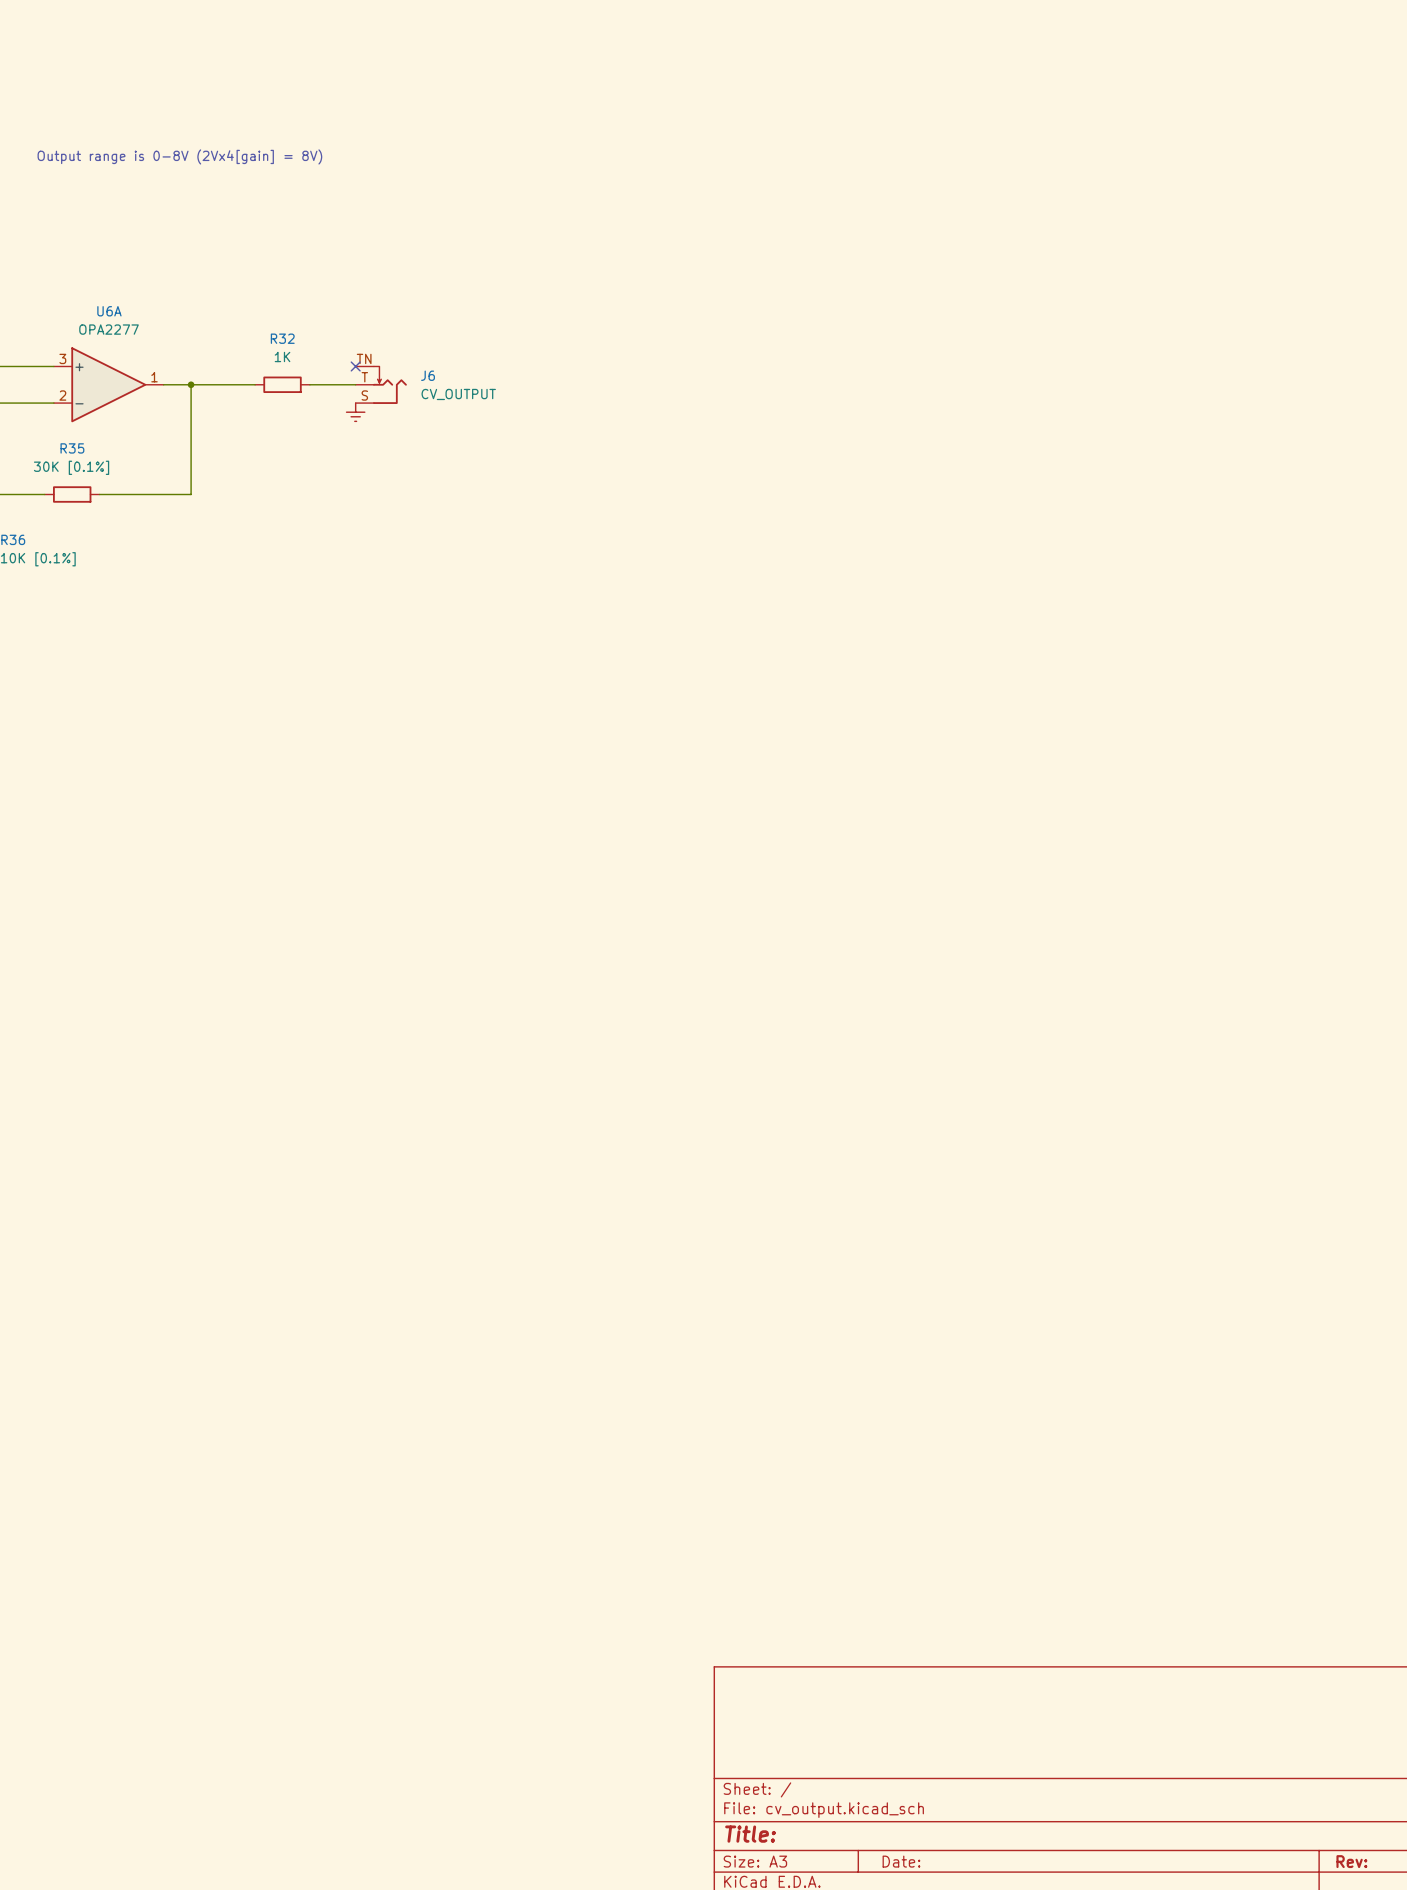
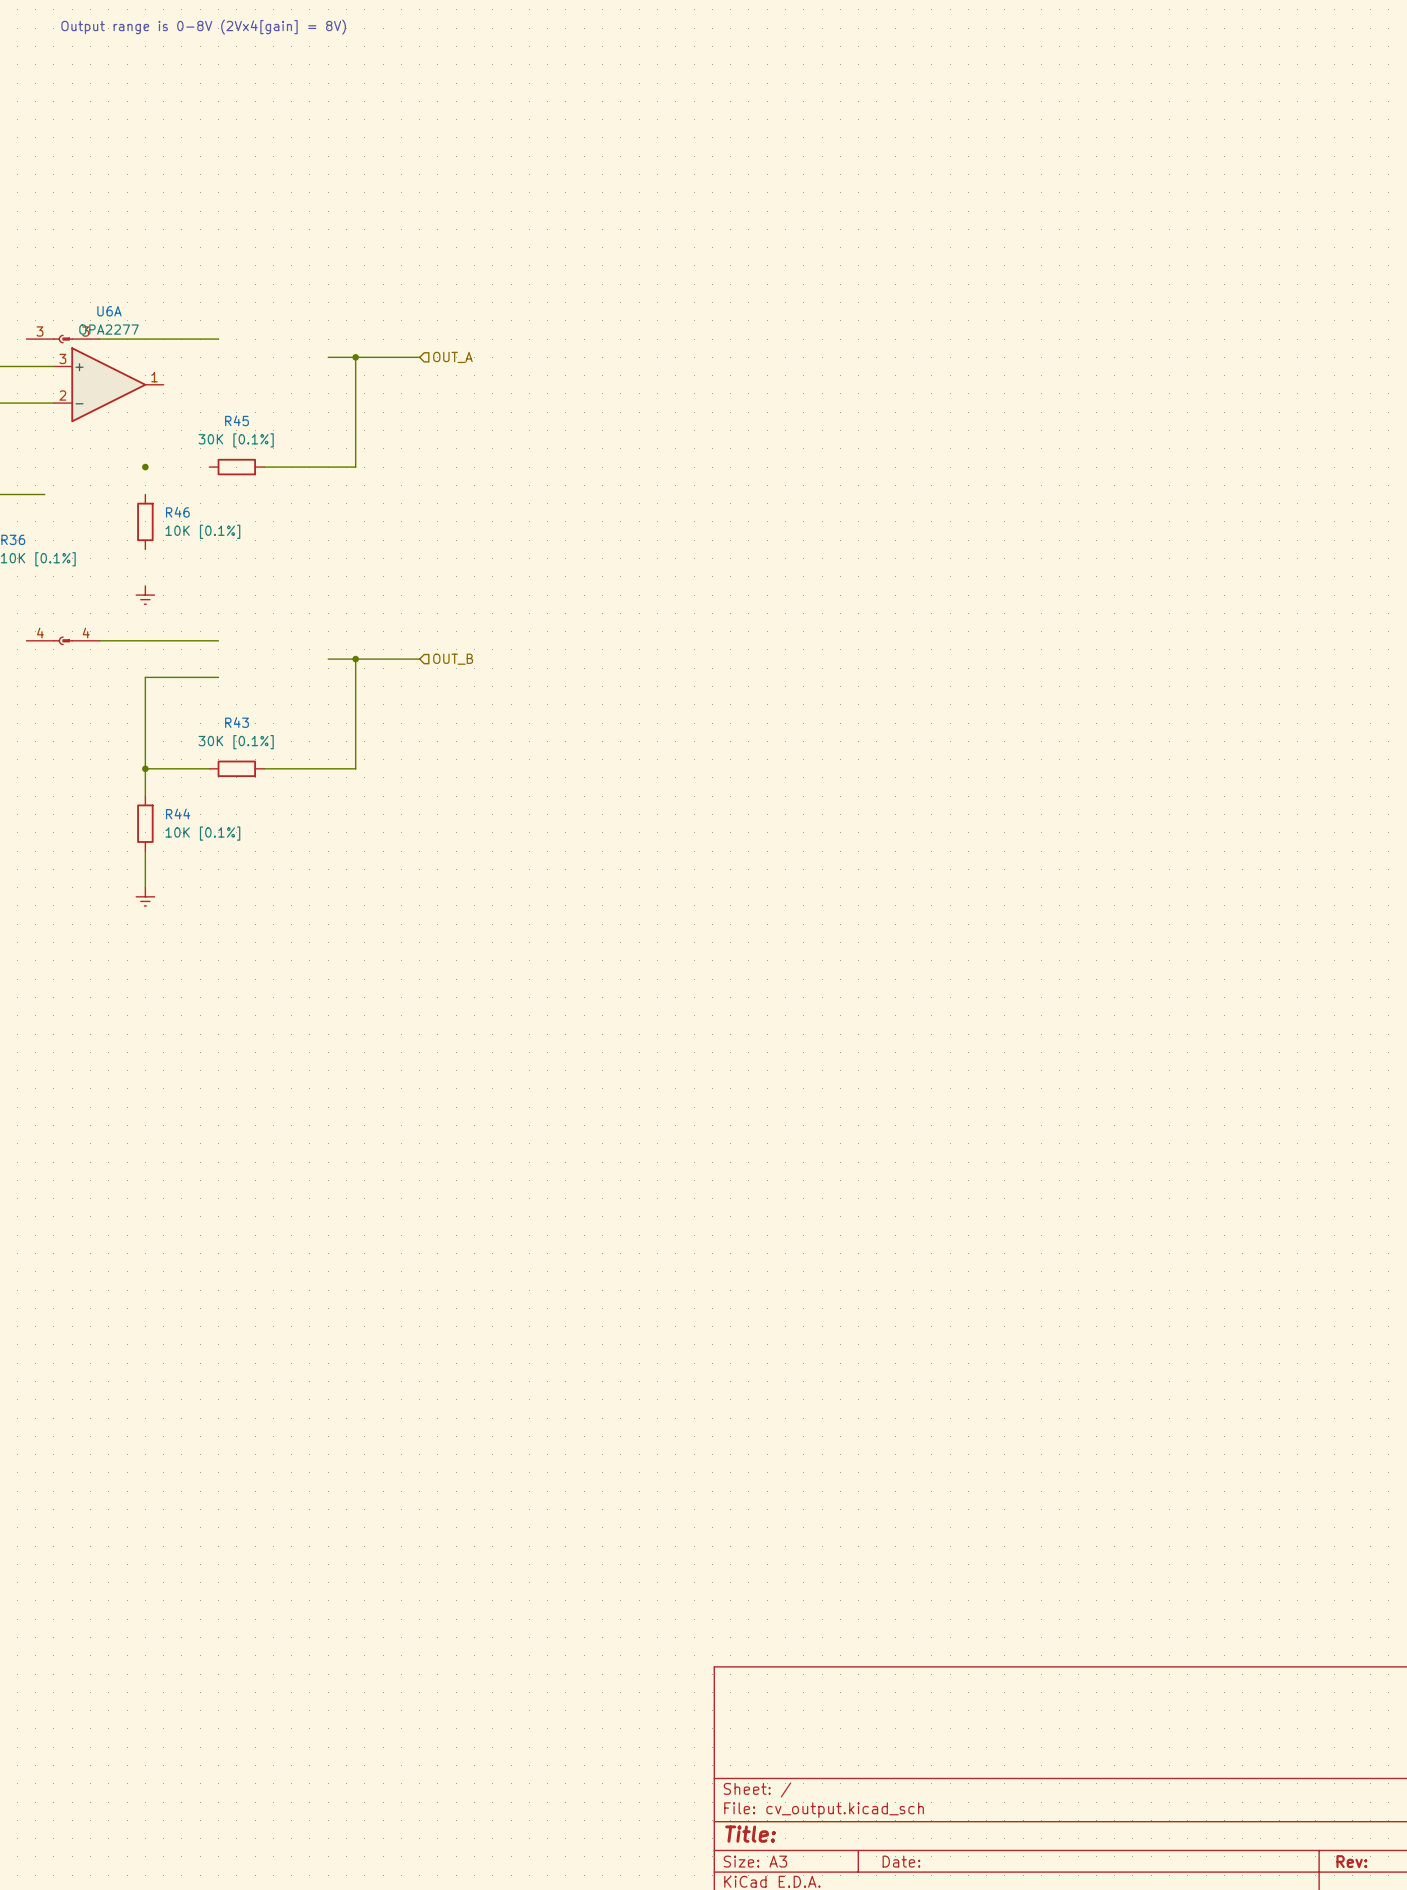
text position: Output range is 0-8V (2Vx4[gain] = 8V) (179, 156) -> Output range is 0-8V (2Vx4[gain] = 8V) (203, 27)
part: none -> (45, 339)
part: none -> (81, 339)
wire: none -> (99, 339) (218, 339)
junction: none -> (355, 357)
hierarchical label: none -> OUT_A (452, 357)
no-connect mark: (355, 366) -> none
wire: (163, 384) (255, 384) -> (328, 357) (419, 357)
wire: (191, 384) (191, 494) (99, 494) -> (355, 357) (355, 467) (264, 467)
junction: (191, 384) -> none
R32: 1K (282, 384) -> none
wire: (309, 384) (355, 384) -> none
J6: CV_OUTPUT (381, 385) -> none
power symbol: (355, 412) -> none
junction: none -> (145, 467)
R45: none -> 30K [0.1%] (236, 467)
R35: 30K [0.1%] (72, 494) -> none
R46: none -> 10K [0.1%] (145, 521)
power symbol: none -> (145, 595)
part: none -> (45, 640)
part: none -> (81, 640)
wire: none -> (99, 640) (218, 640)
wire: none -> (328, 659) (419, 659)
wire: none -> (355, 659) (355, 768) (264, 768)
junction: none -> (355, 659)
hierarchical label: none -> OUT_B (453, 659)
wire: none -> (218, 677) (145, 677) (145, 796)
wire: none -> (145, 768) (209, 768)
junction: none -> (145, 768)
R43: none -> 30K [0.1%] (236, 768)
R44: none -> 10K [0.1%] (145, 823)
wire: none -> (145, 851) (145, 887)
power symbol: none -> (145, 896)

